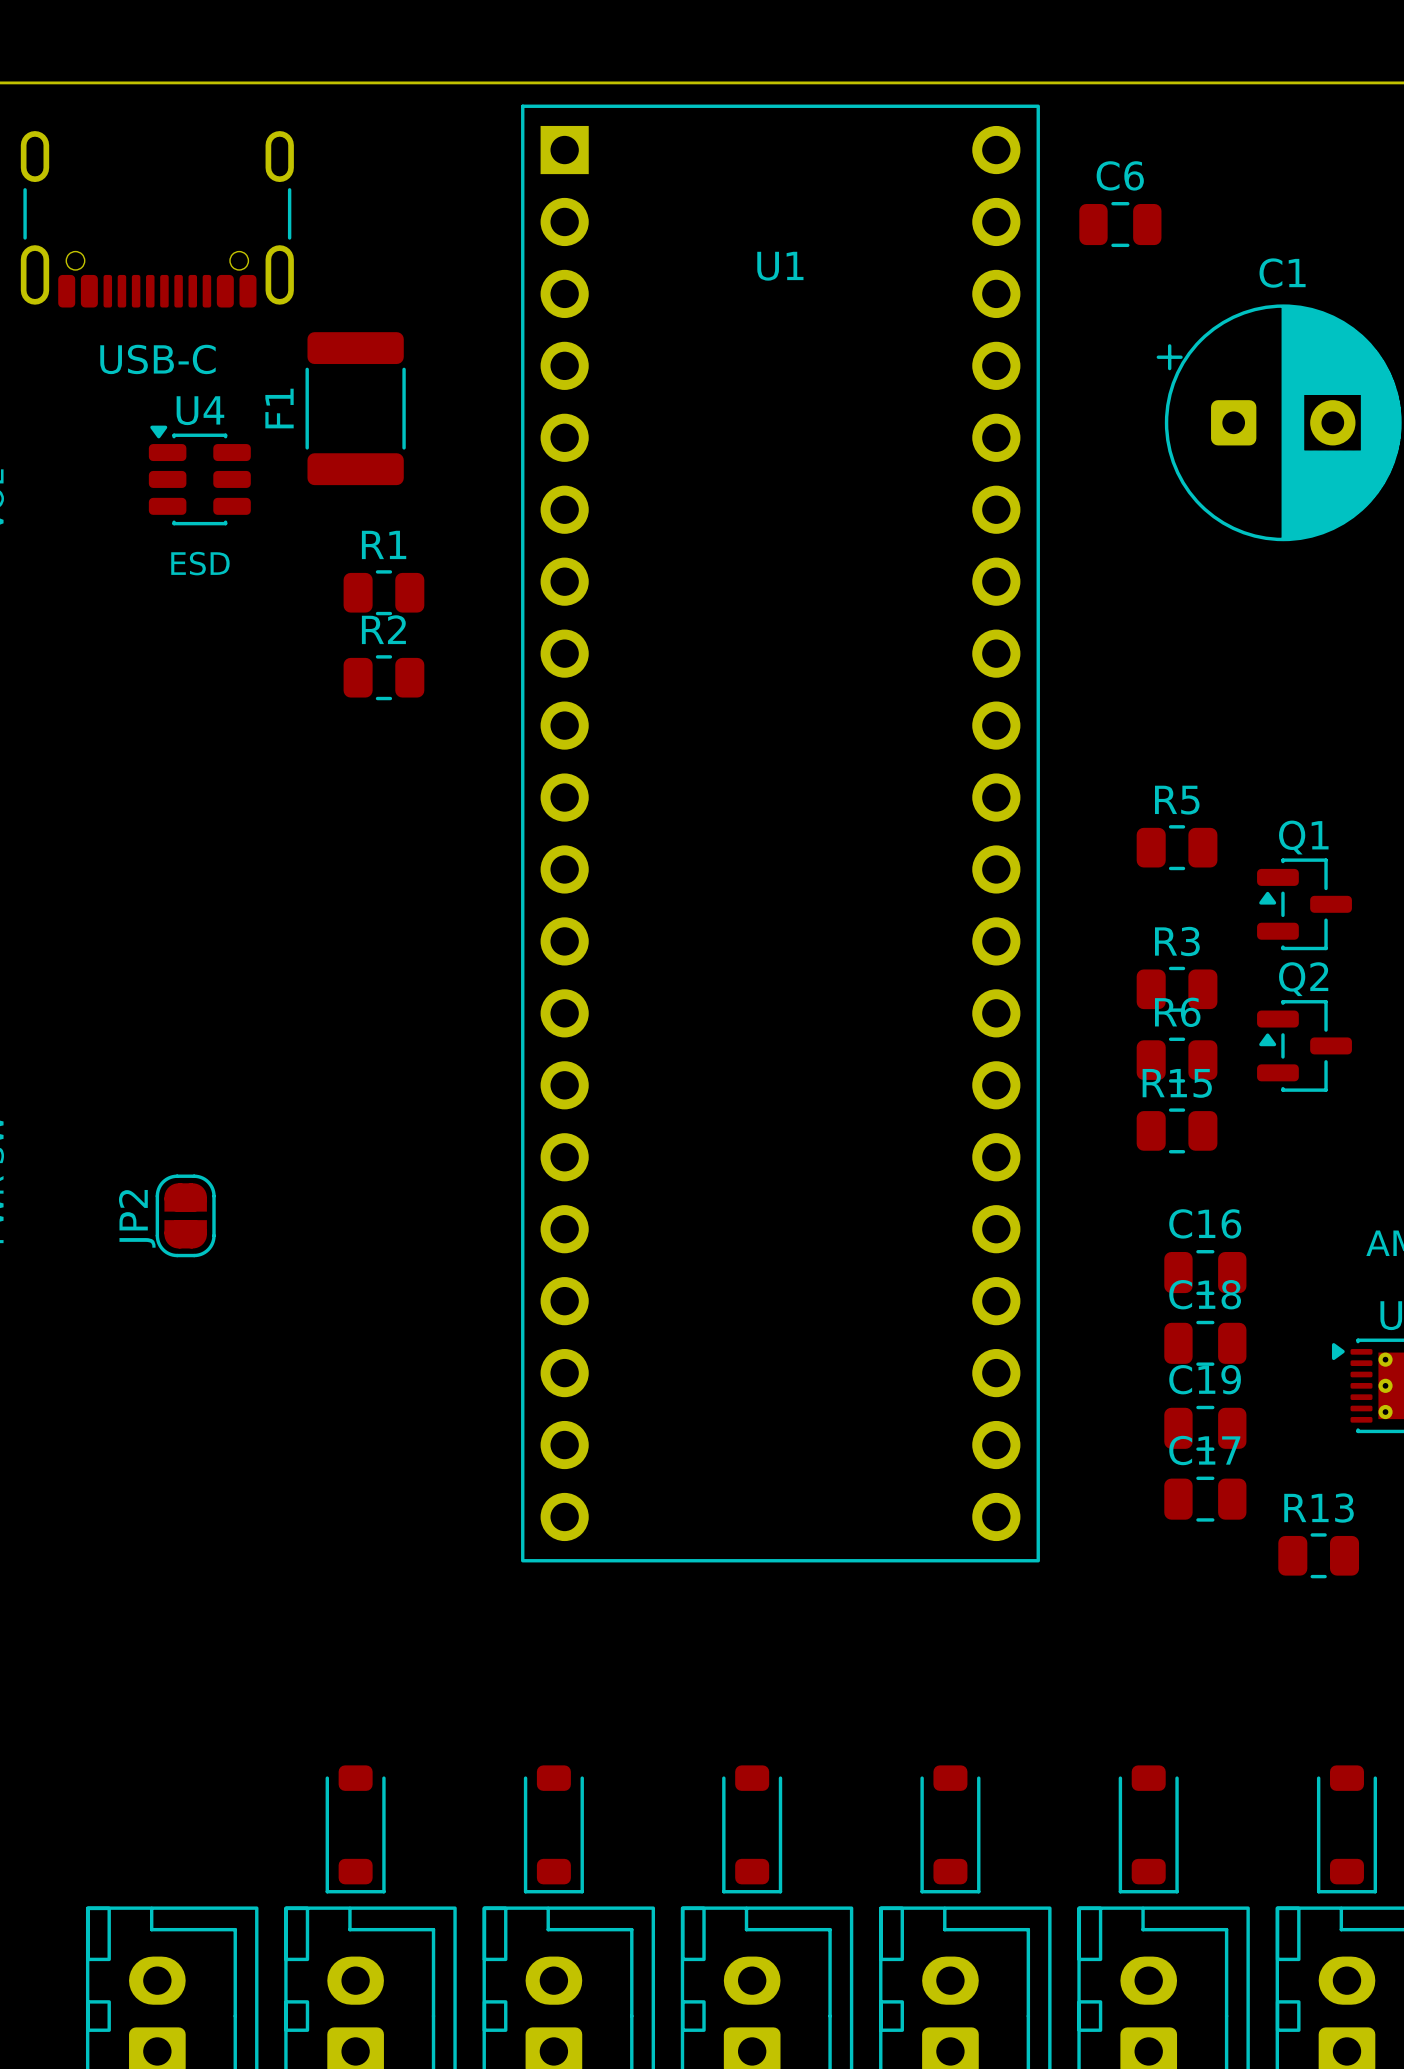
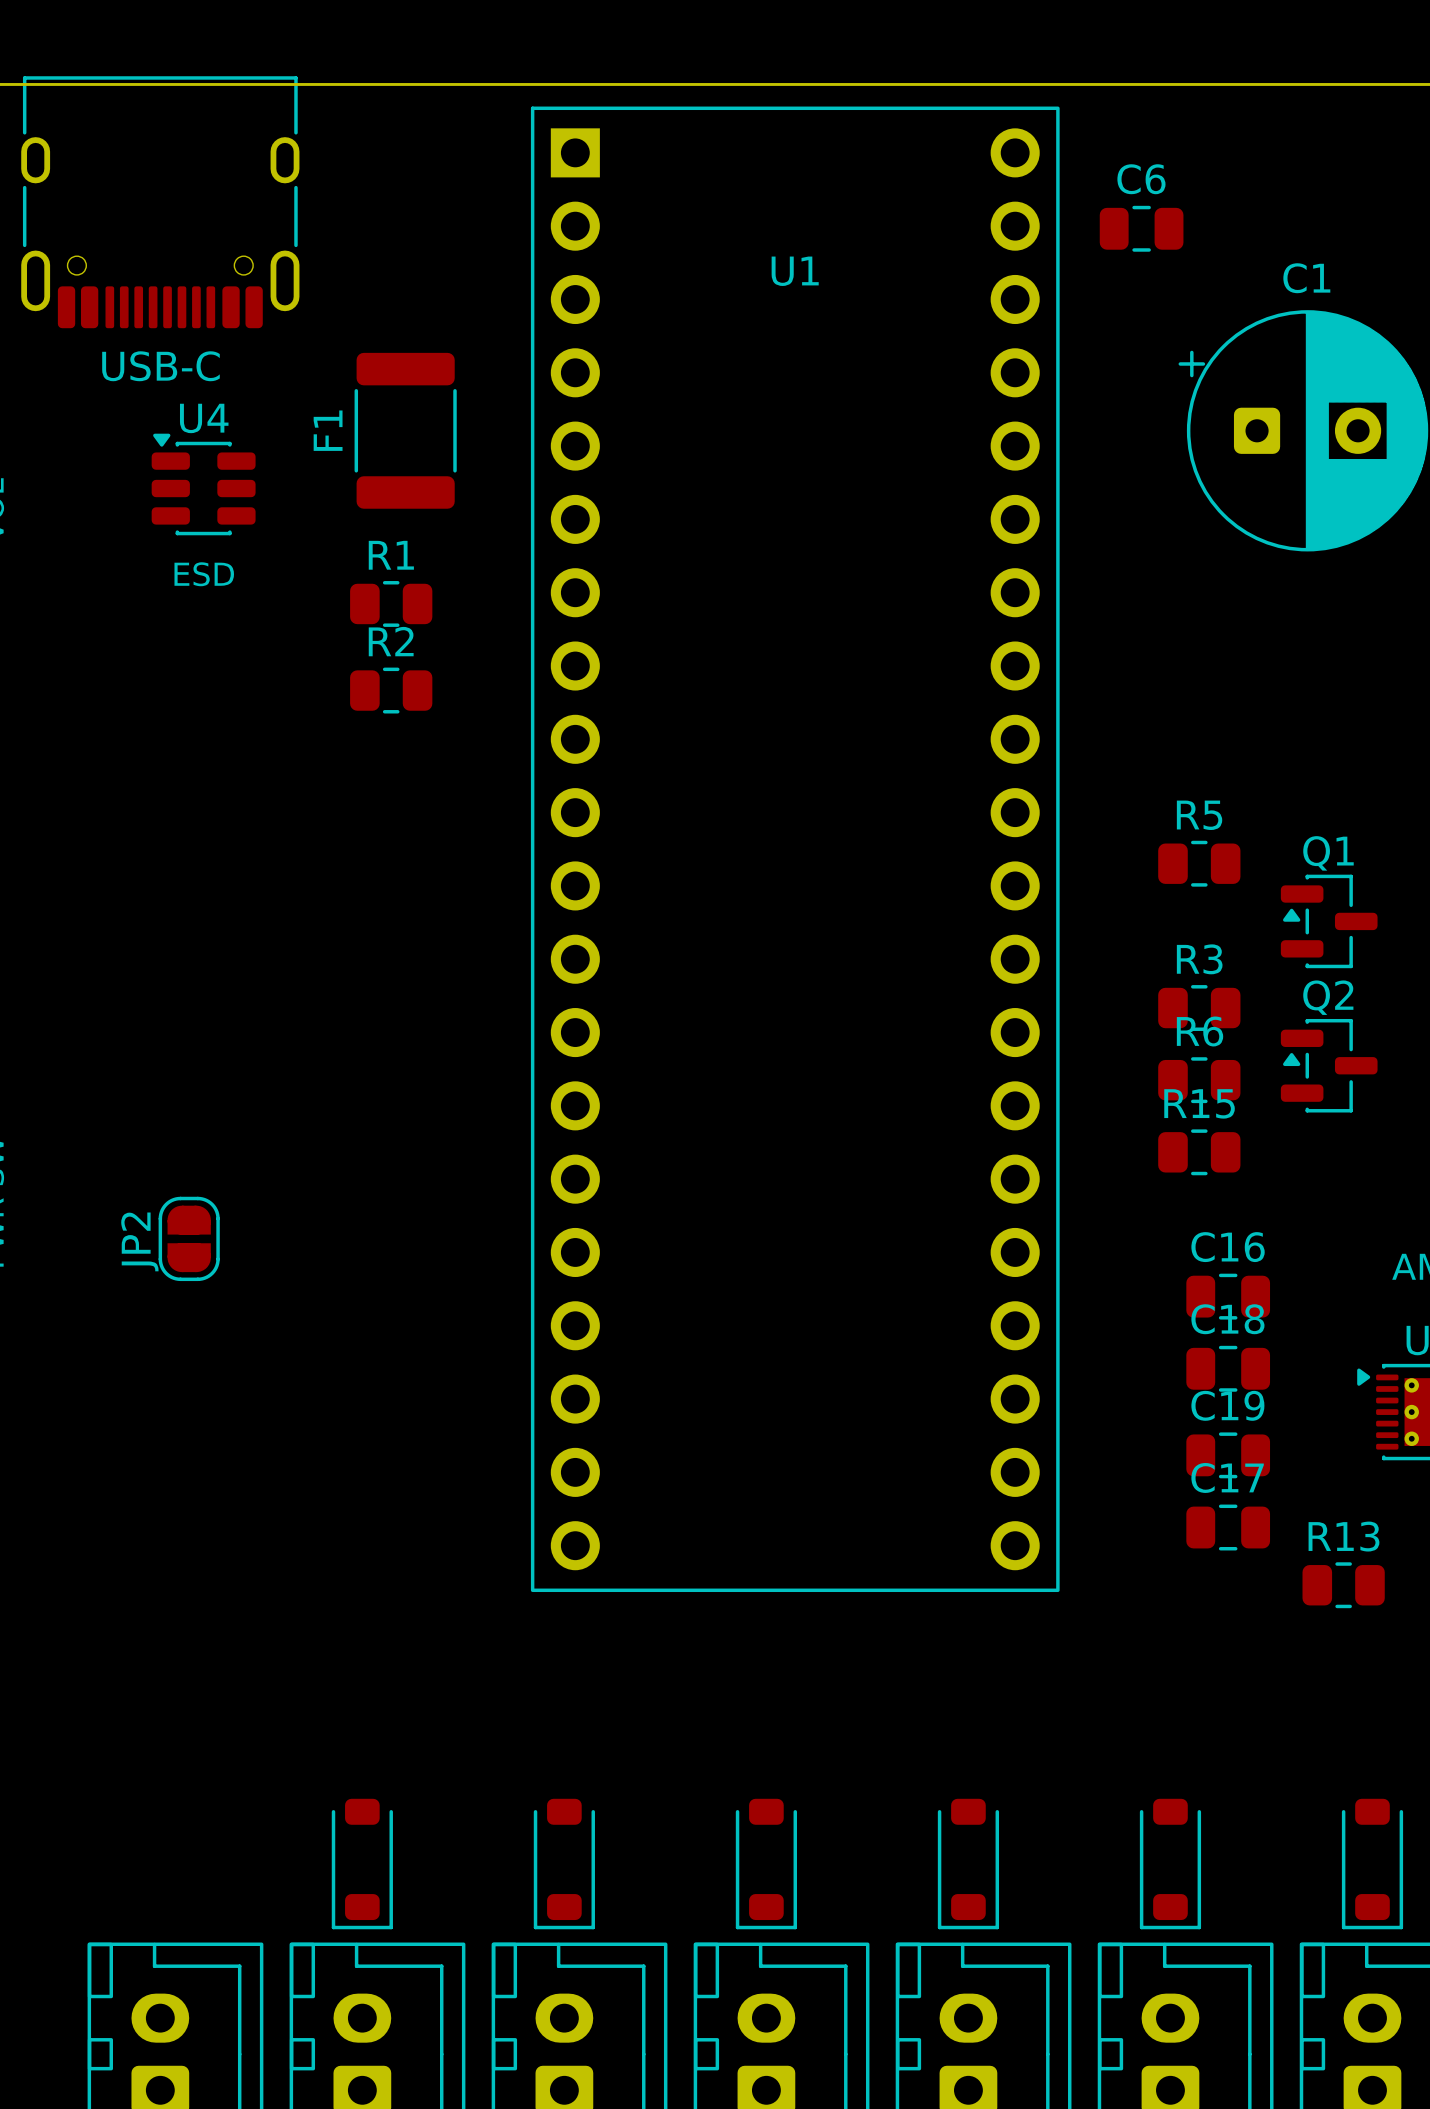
part footprint: [20, 131, 294, 308] -> [21, 76, 300, 329]
F1 position: (355, 408) -> (405, 430)

